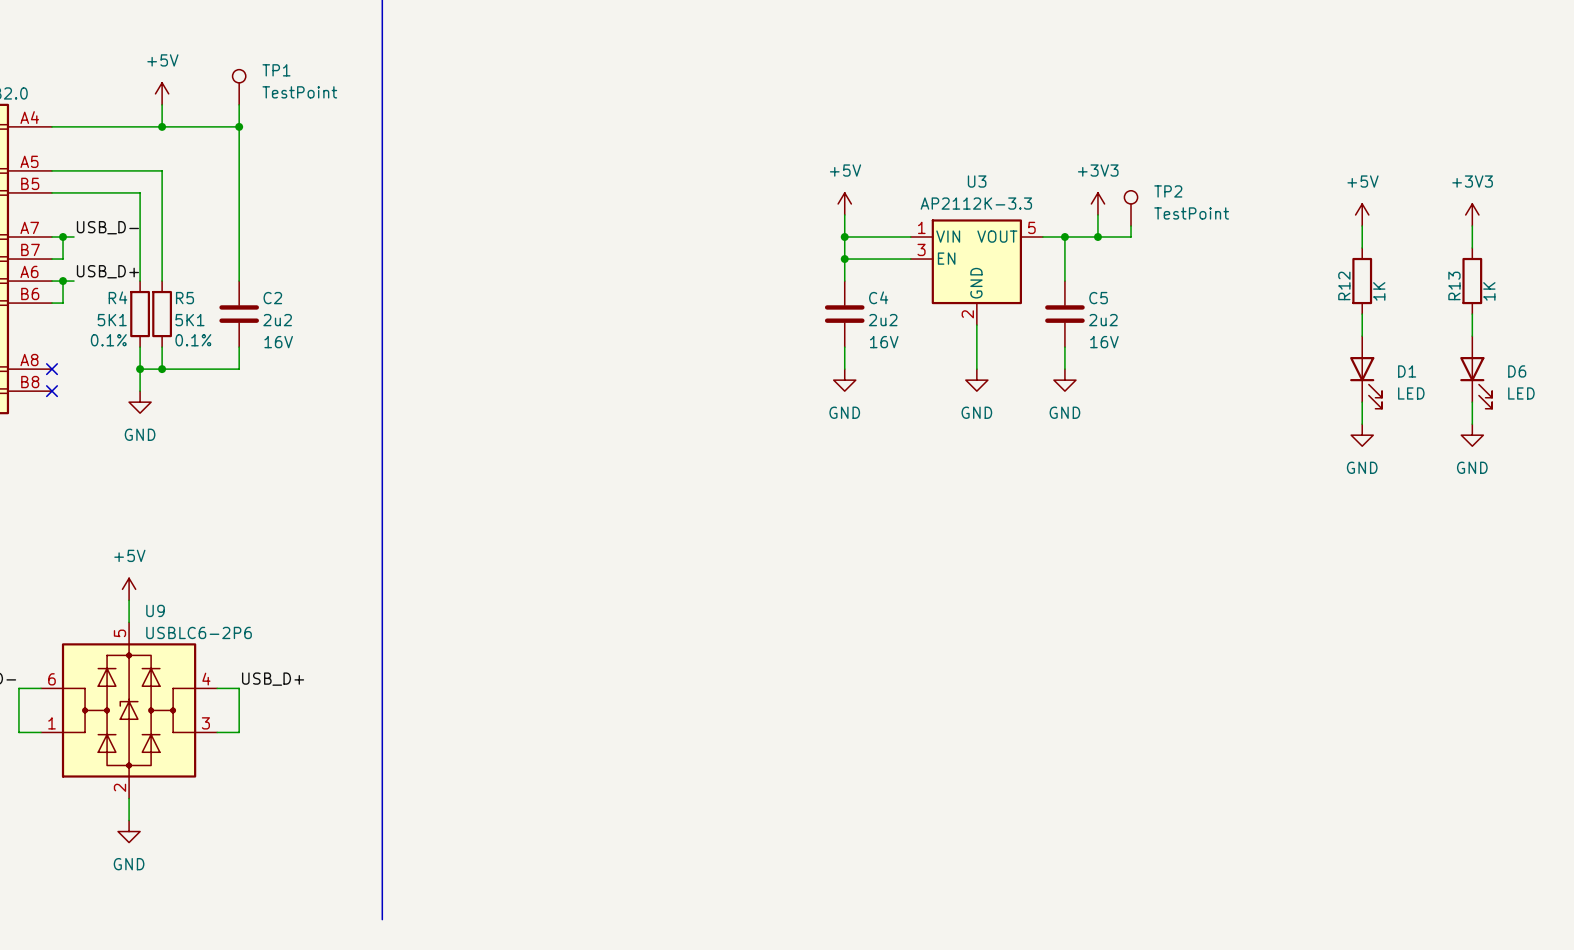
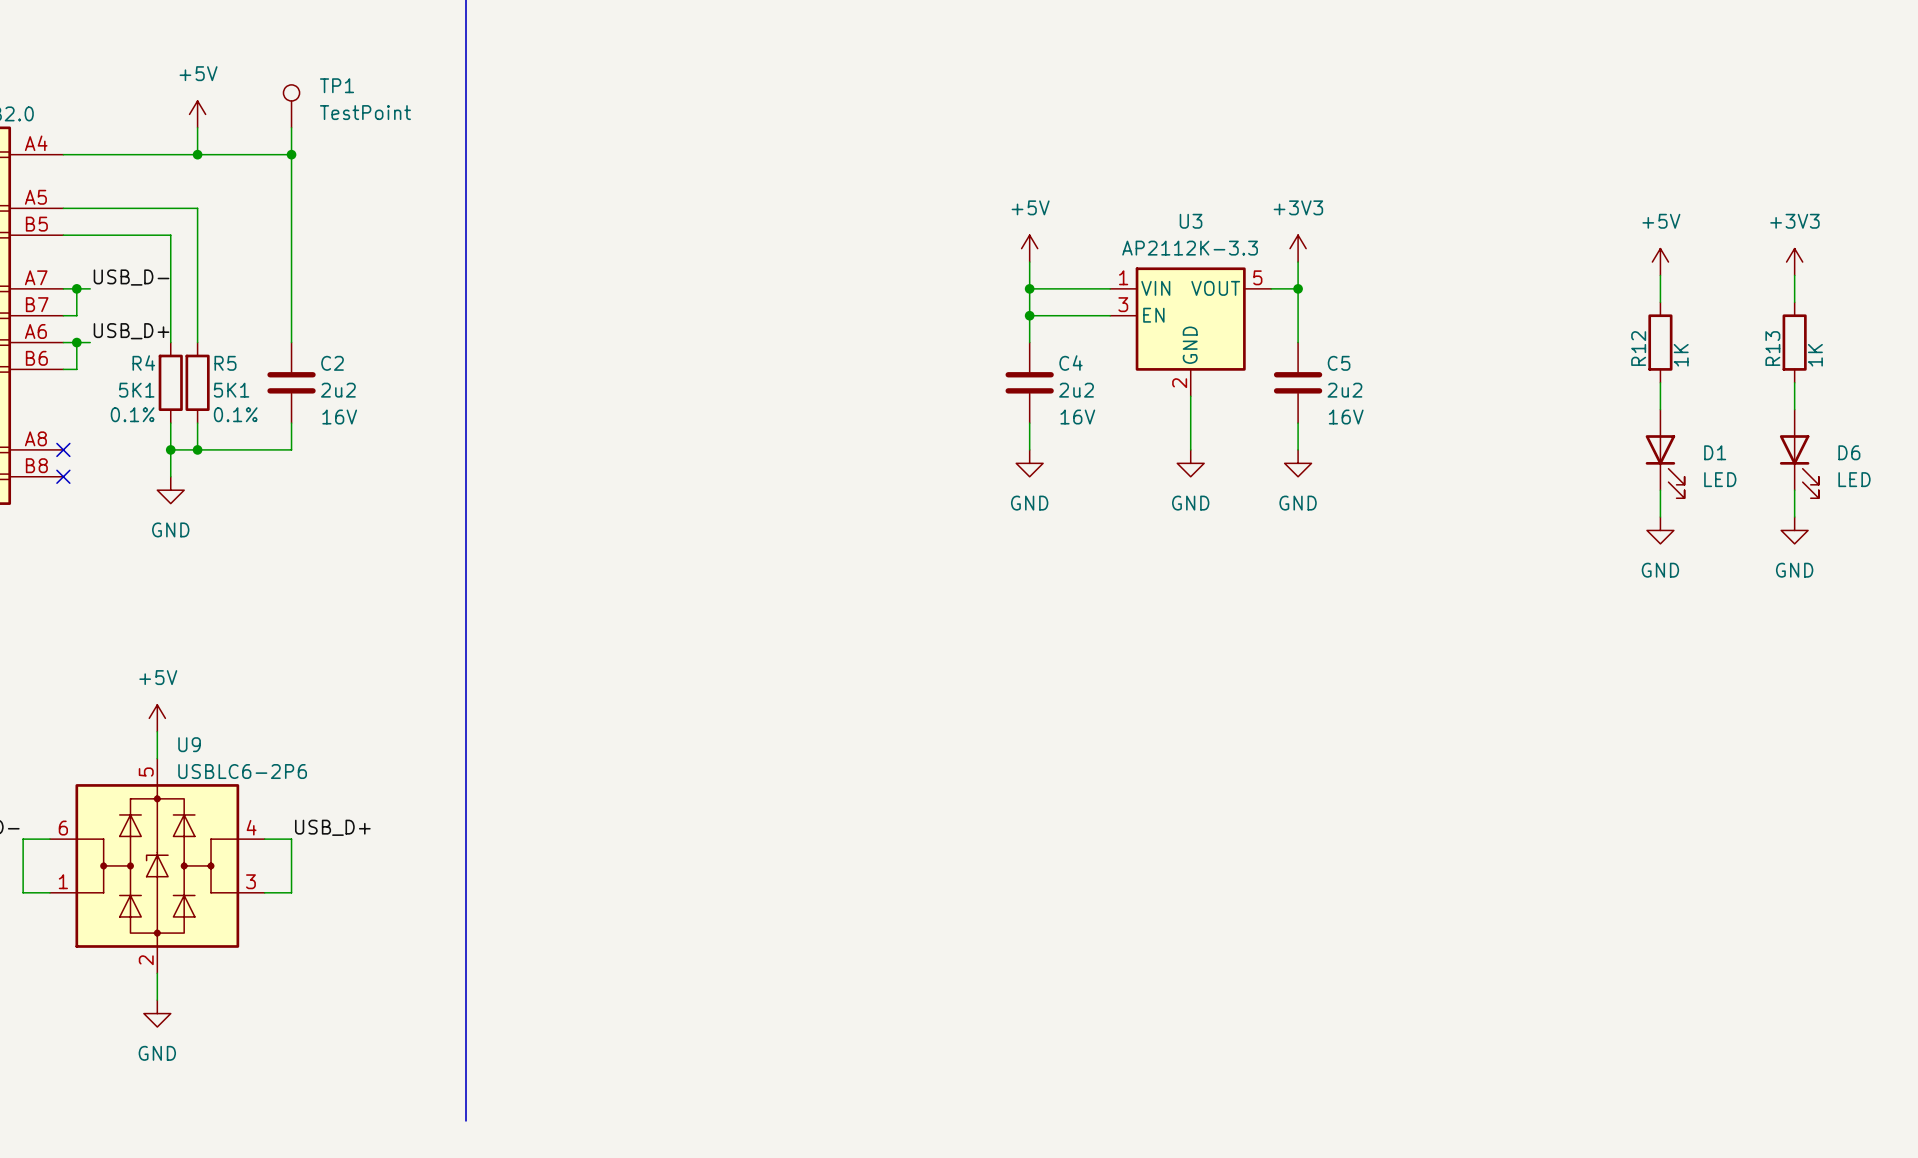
power symbol position: +3V3 (1097, 203) -> +3V3 (1298, 248)
TP2: TestPoint (1131, 208) -> none
wire: (1097, 214) (1097, 236) -> none
wire: (1131, 225) (1131, 236) (1064, 236) -> (1298, 262) (1298, 288)
junction: (1097, 236) -> none

